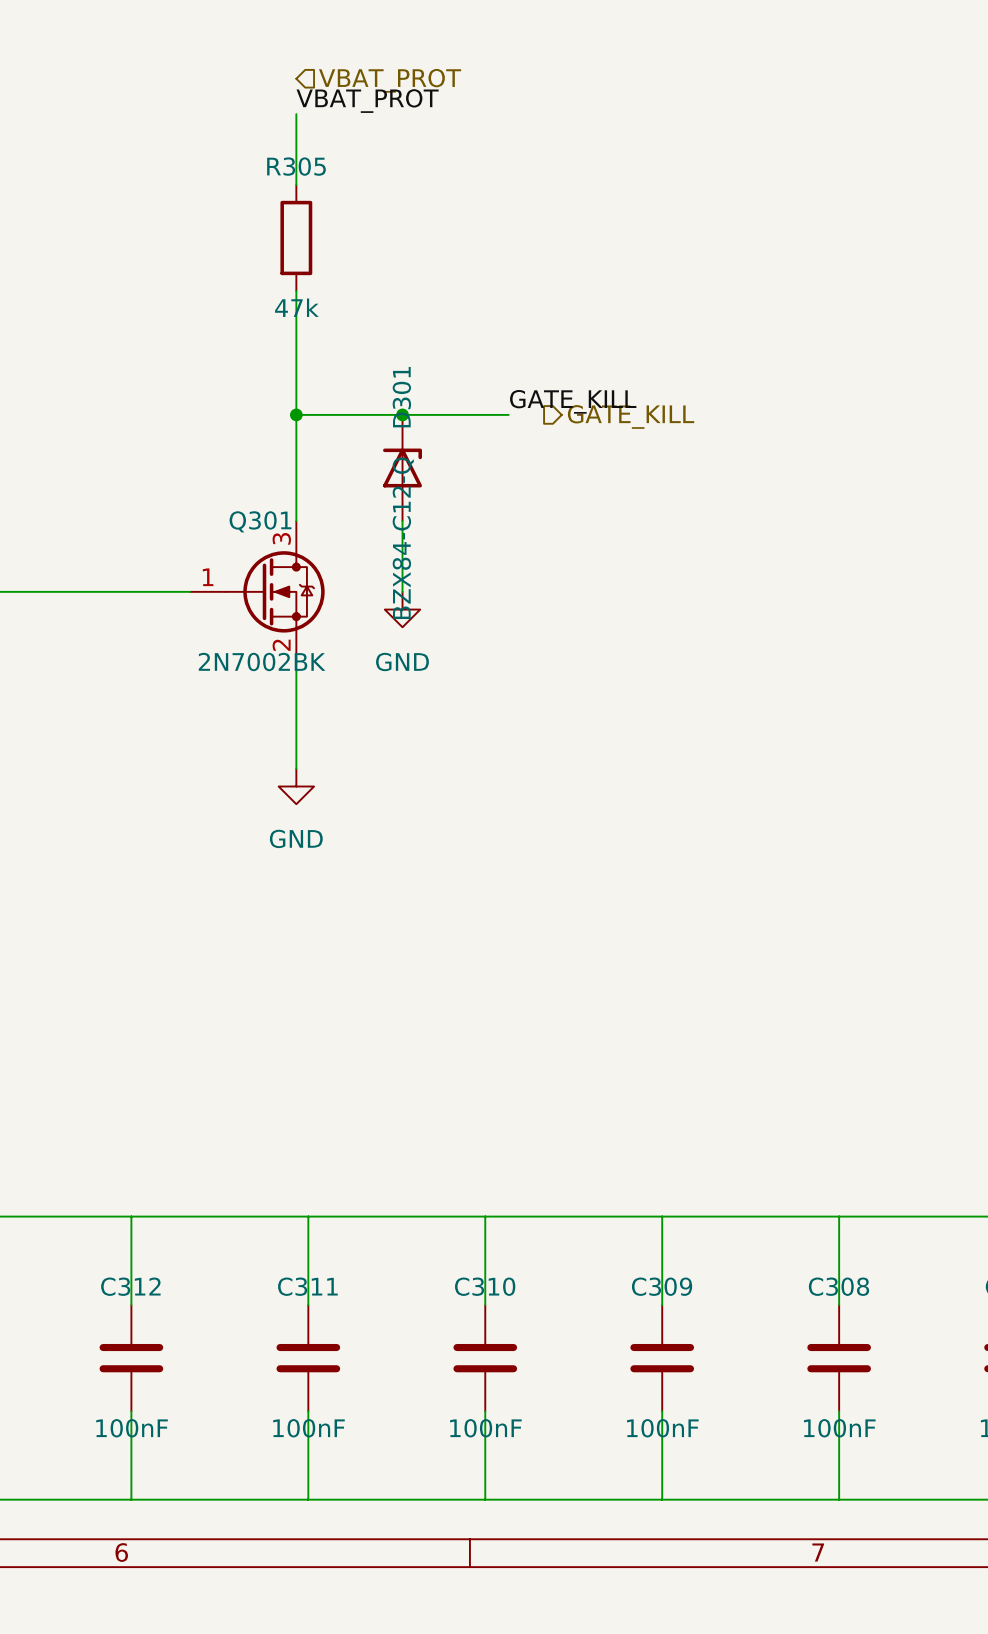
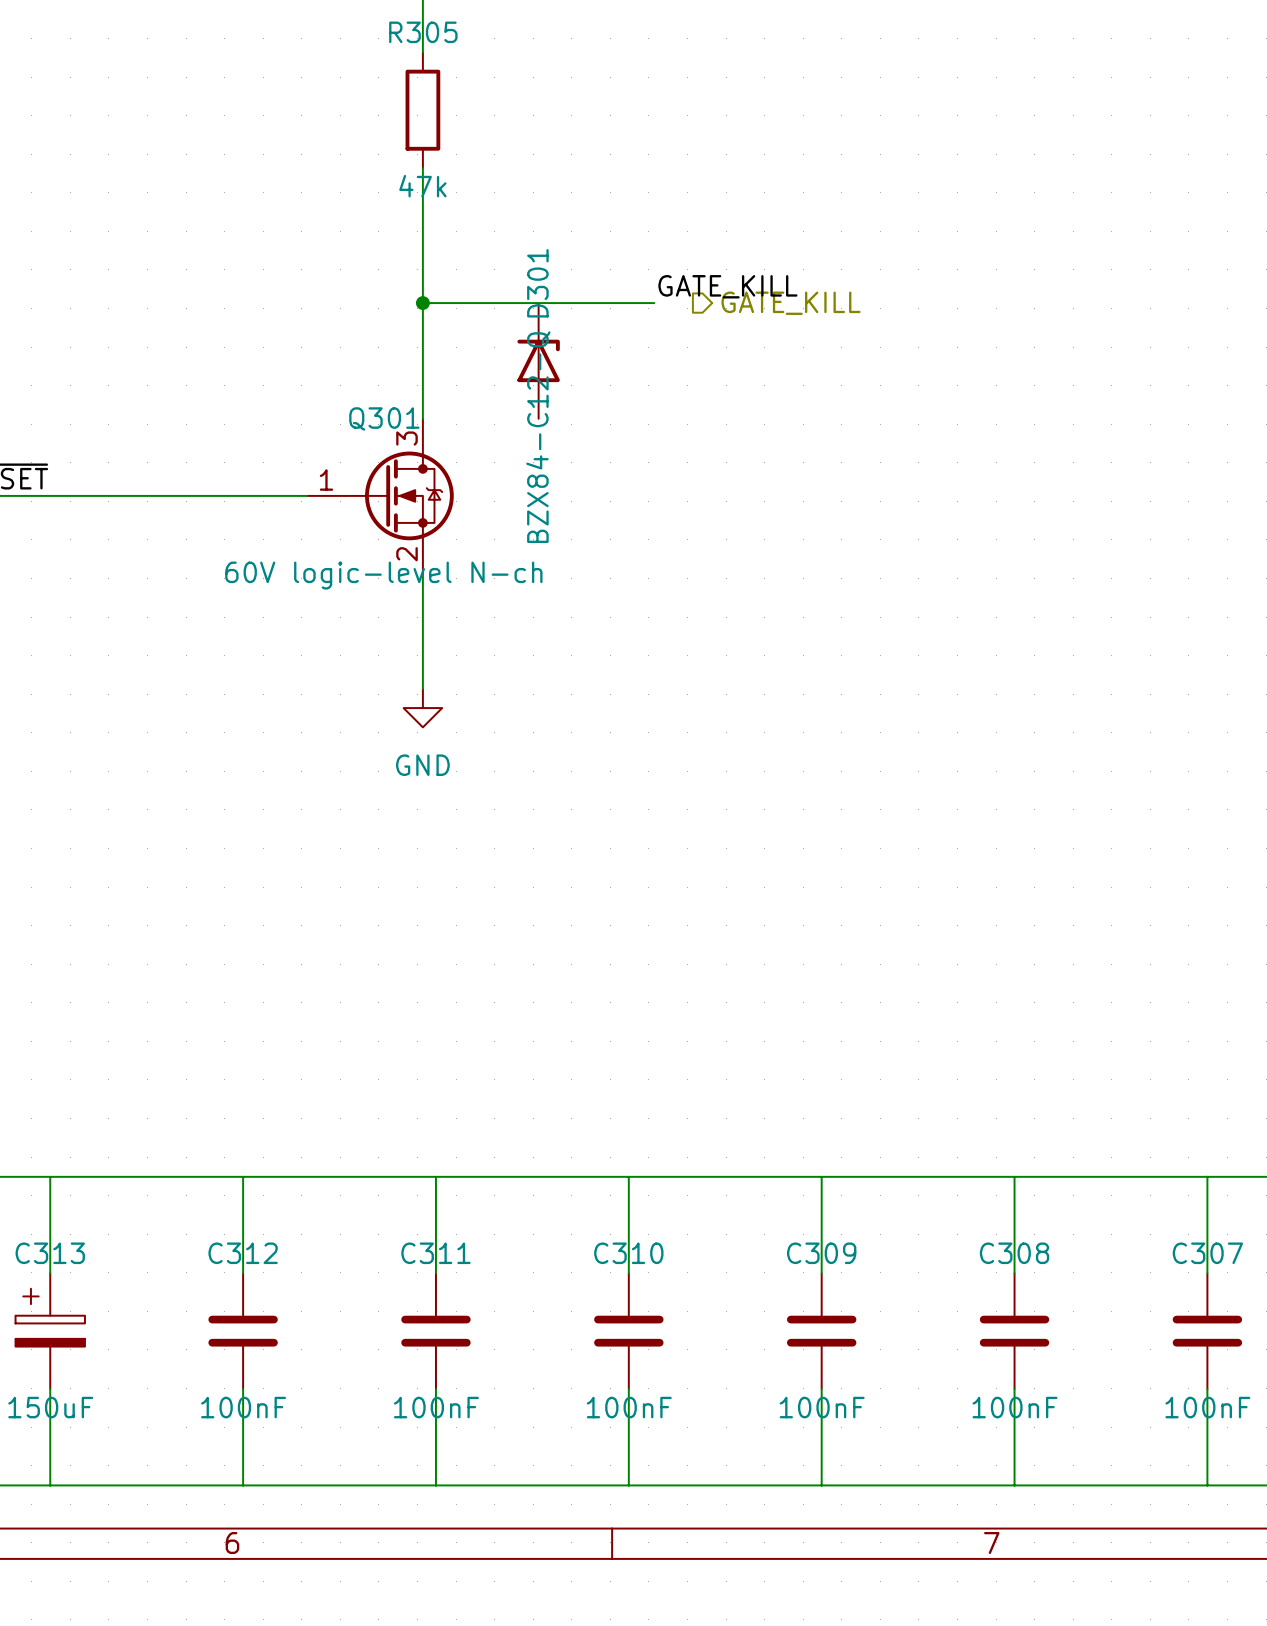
junction: (402, 414) -> none
wire: (402, 521) (402, 591) -> none
power symbol: GND (402, 609) -> none
Q301 value: 2N7002BK (262, 661) -> 60V logic-level N-ch (383, 575)

